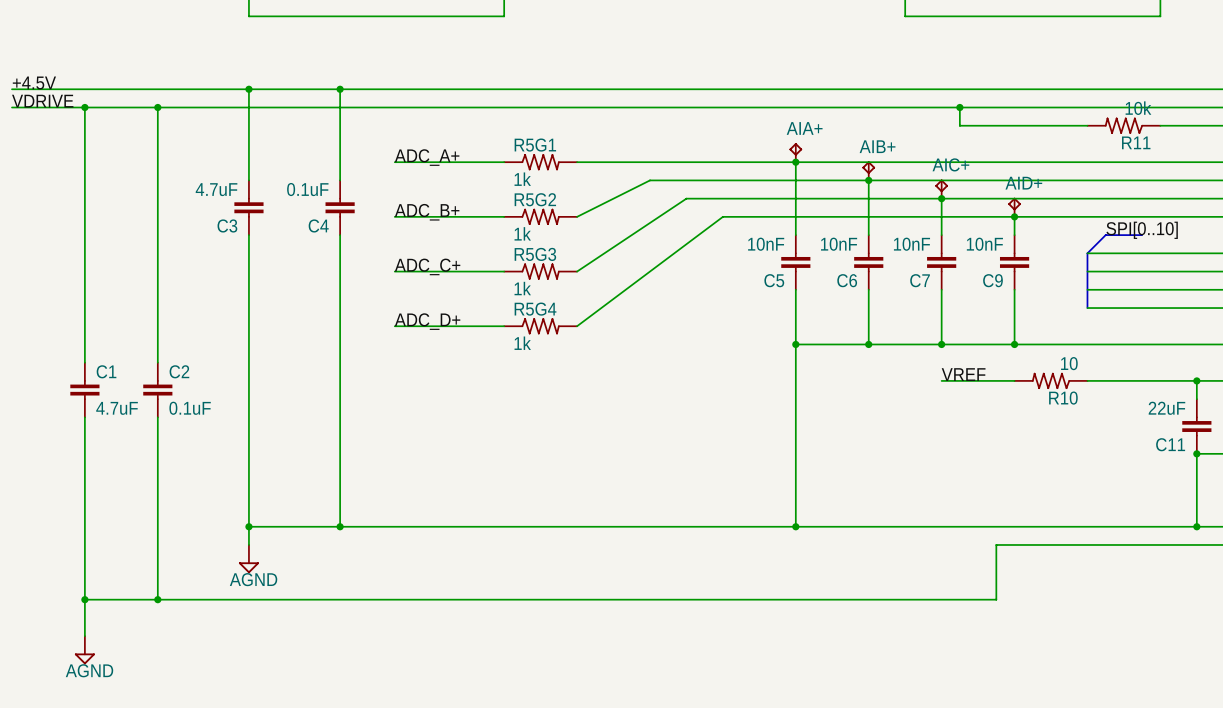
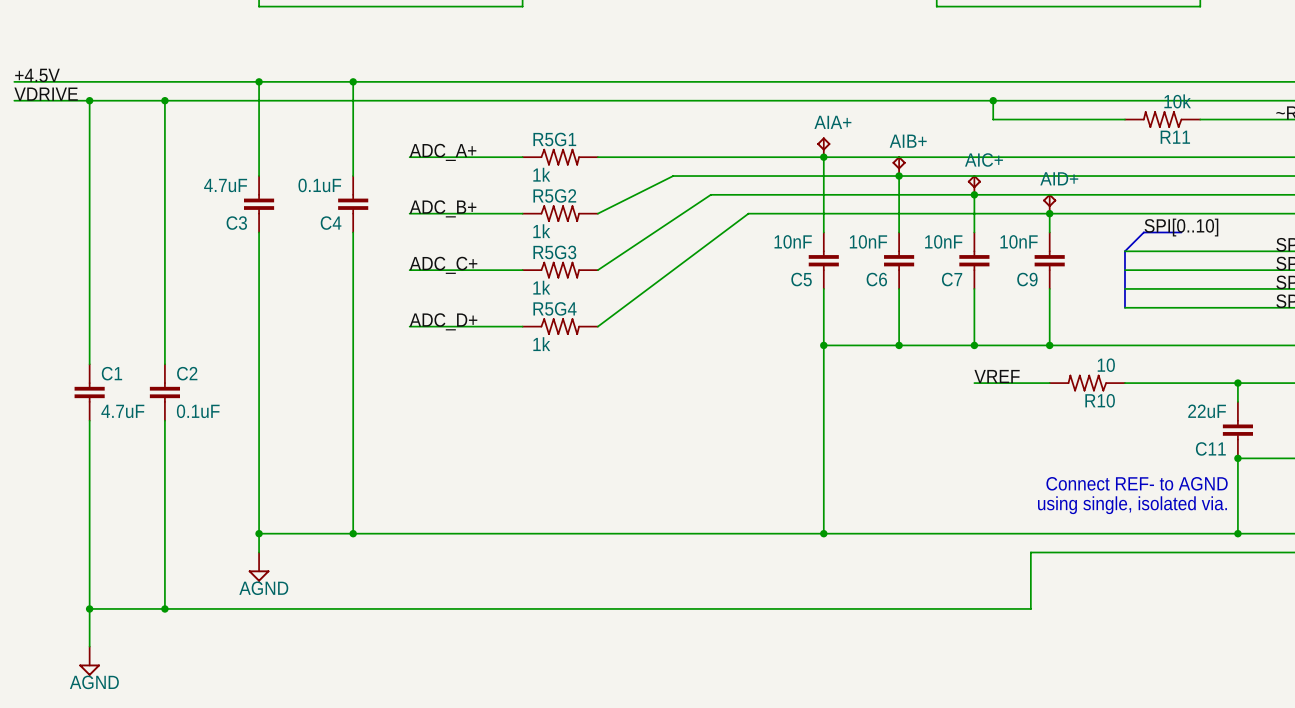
text: none -> Connect REF- to AGND (1137, 483)
text: none -> using single, isolated via. (1132, 505)

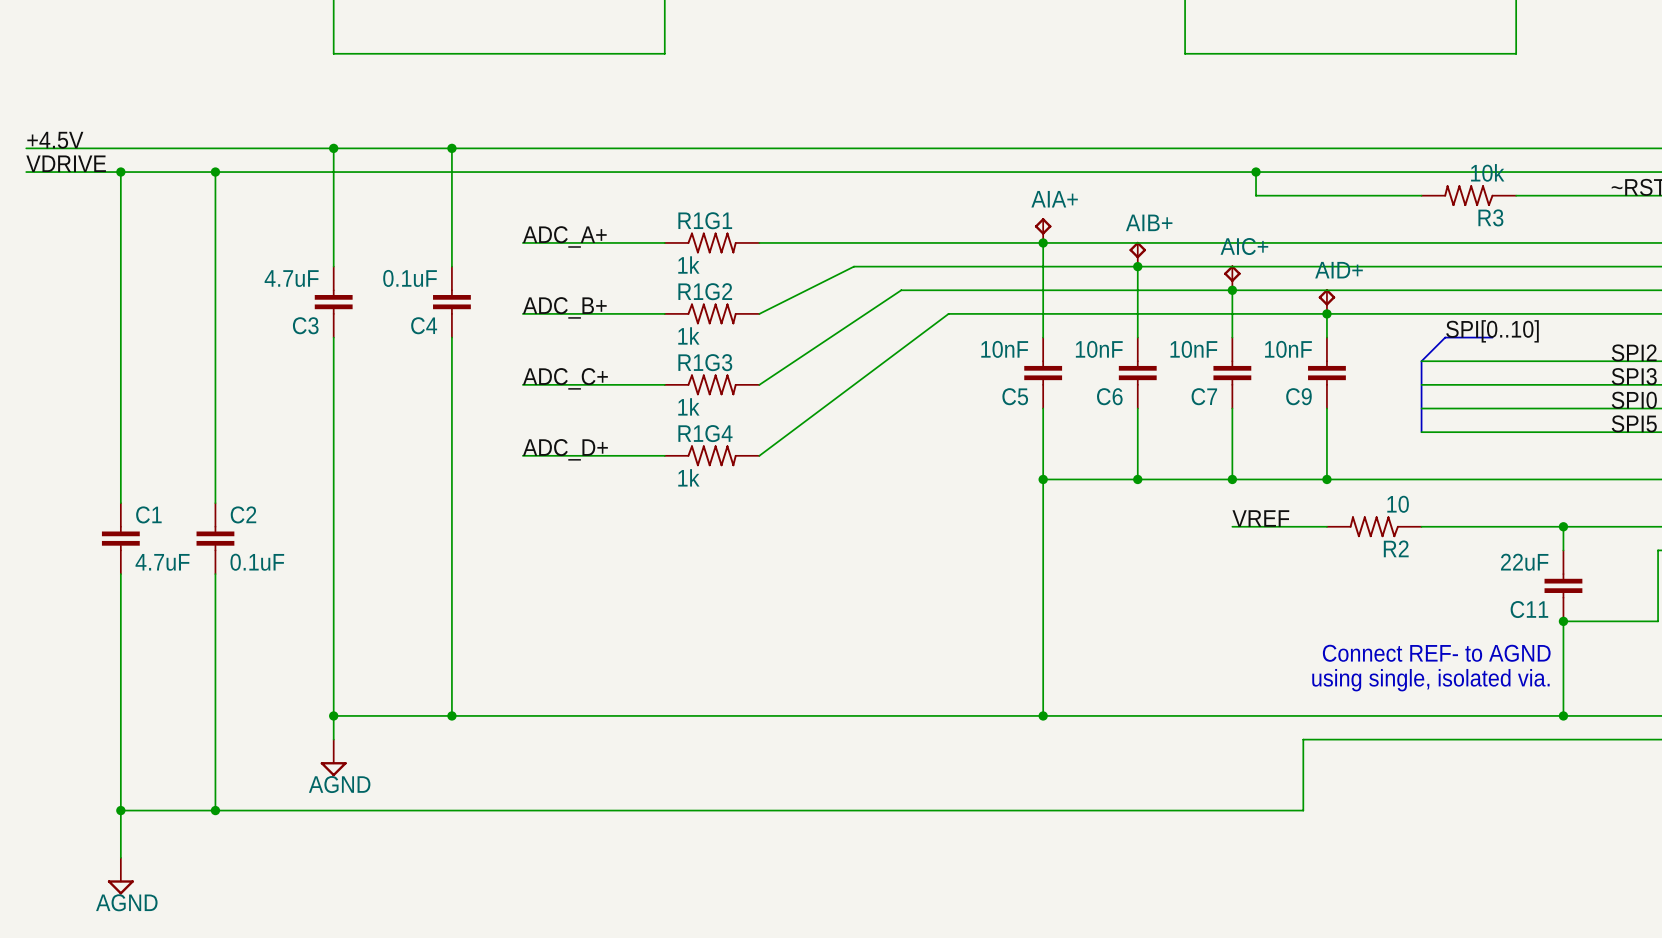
R11 name: R11 (1175, 137) -> R3 (1490, 217)
R5G1 name: R5G1 (554, 139) -> R1G1 (705, 220)
R5G2 name: R5G2 (554, 195) -> R1G2 (705, 291)
R5G3 name: R5G3 (554, 252) -> R1G3 (705, 362)
R5G4 name: R5G4 (554, 308) -> R1G4 (705, 433)
R10 name: R10 (1100, 400) -> R2 (1396, 548)

